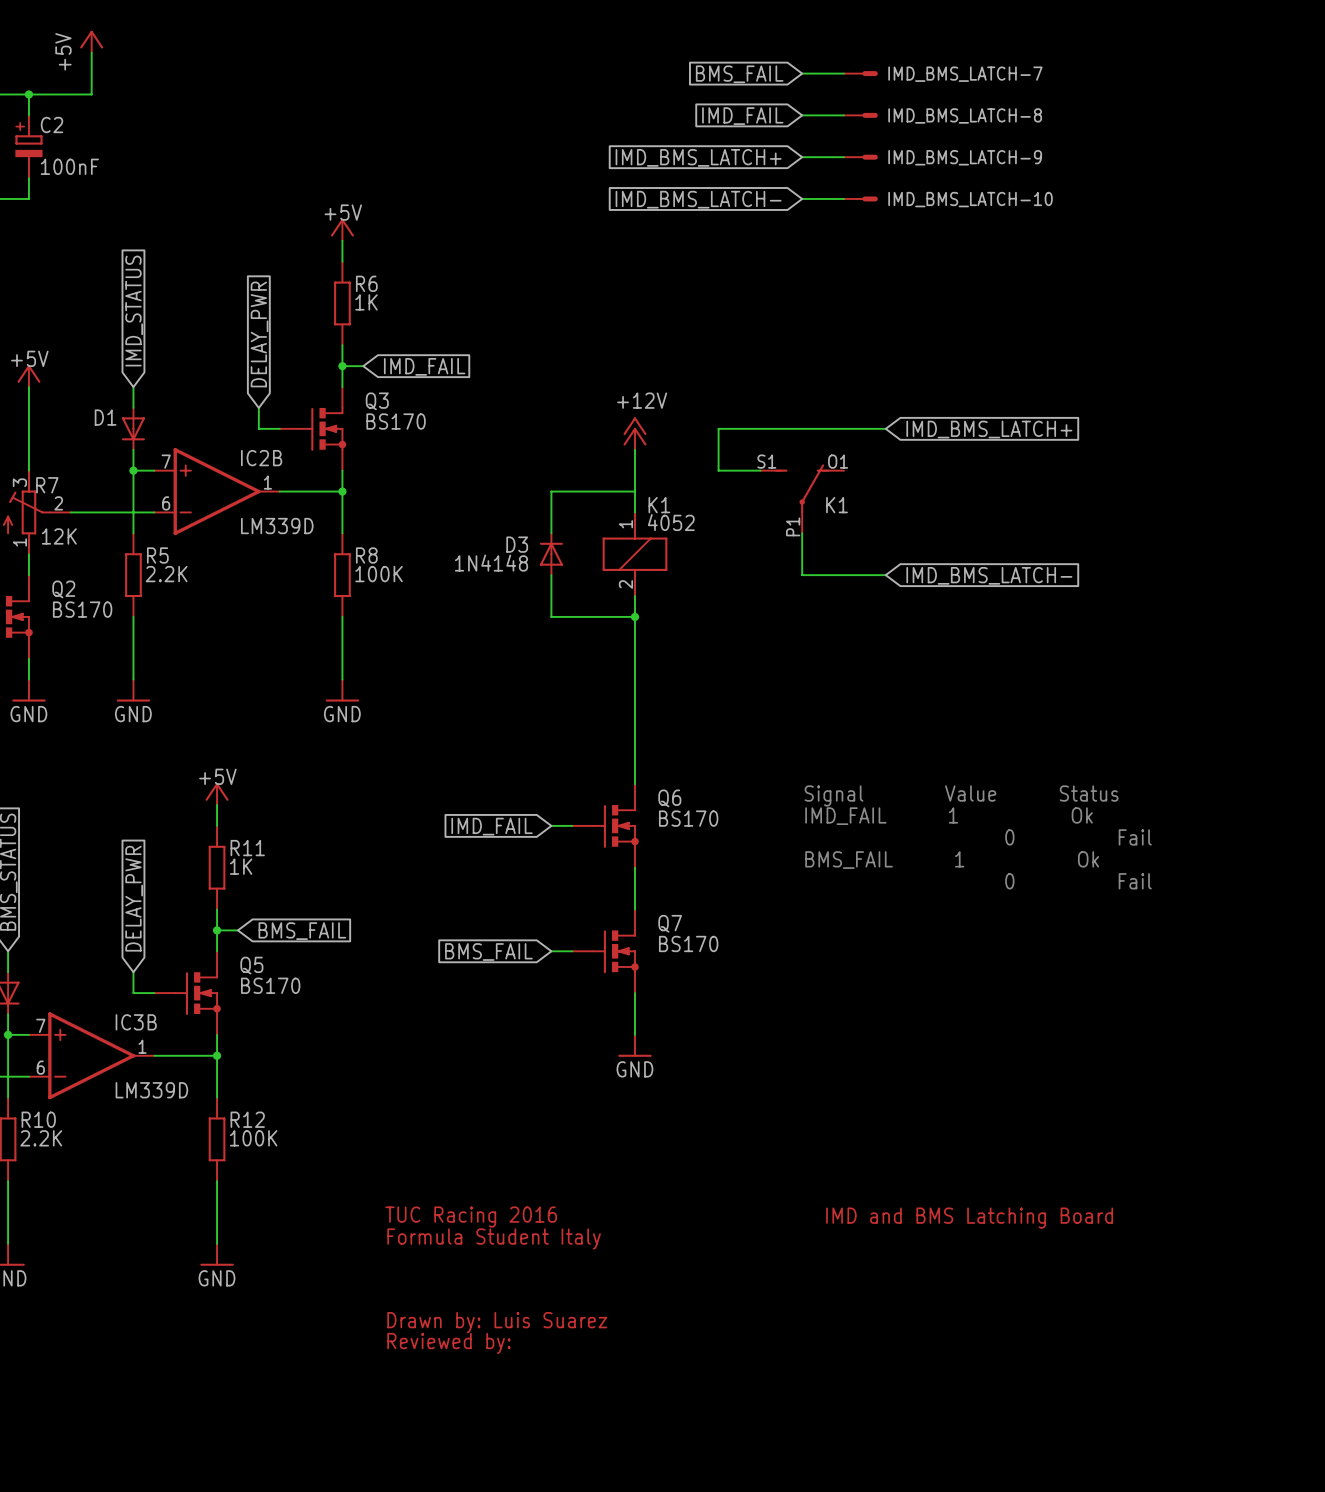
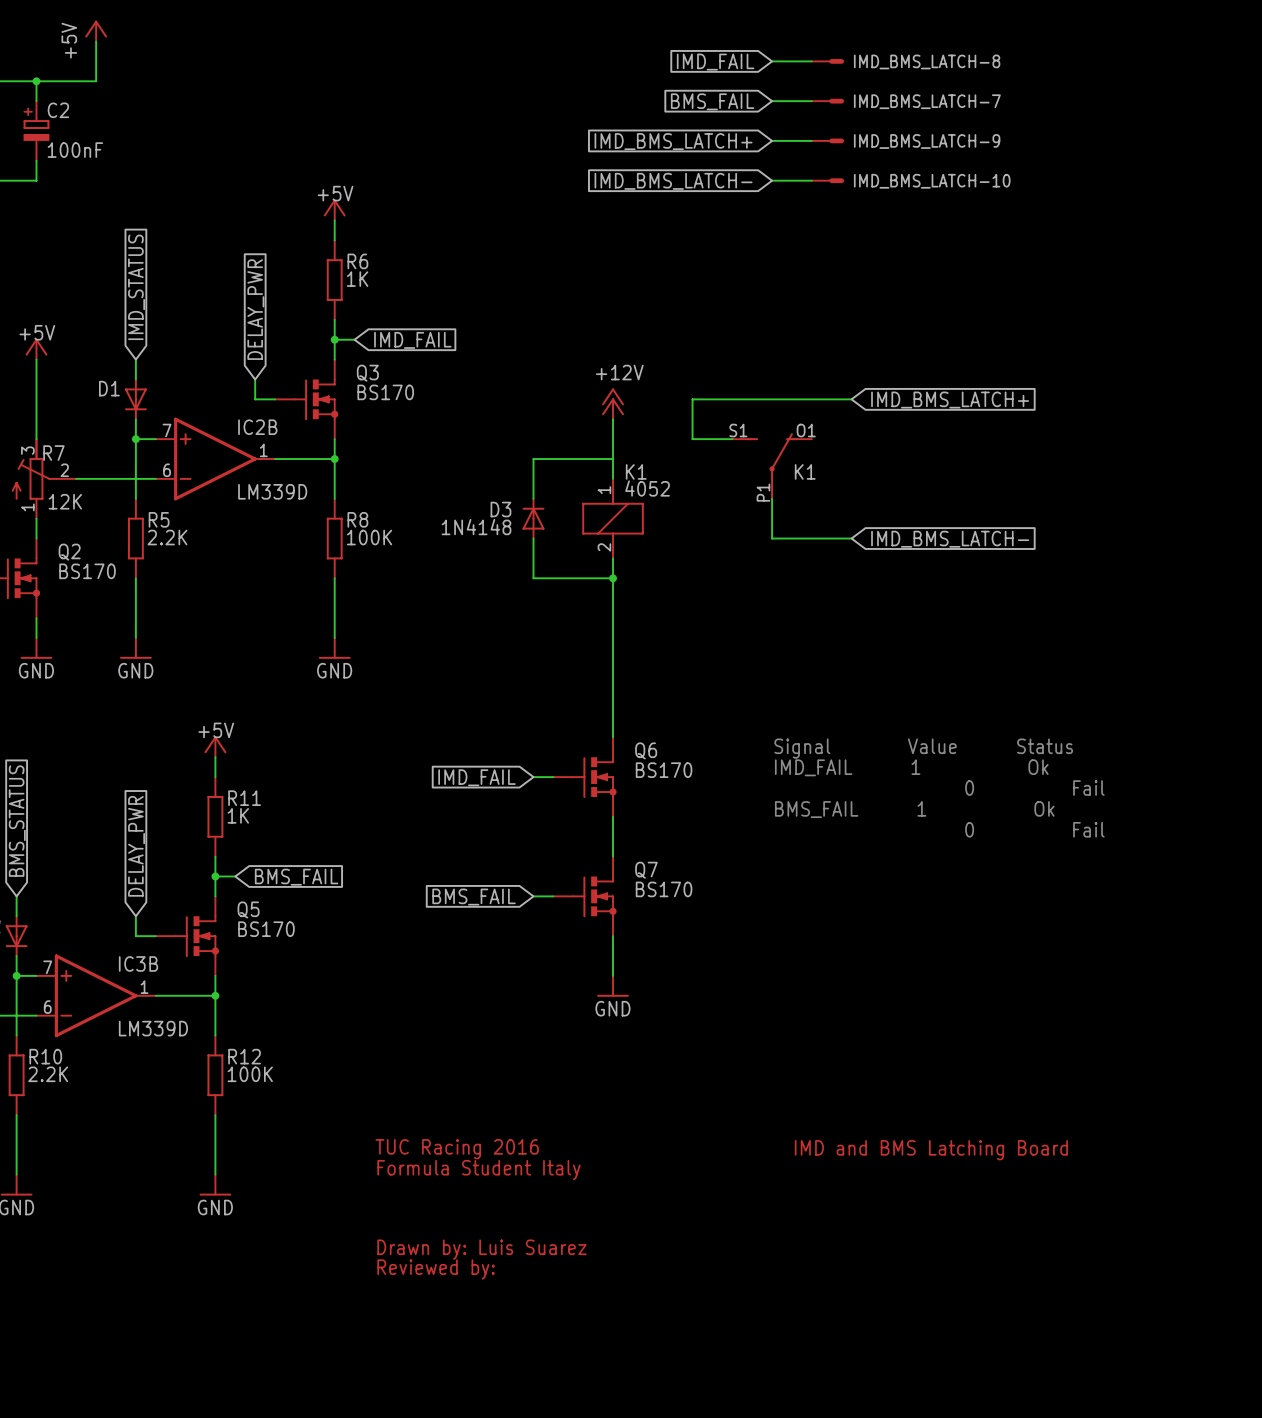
global label: BMS_FAIL (739, 74) -> IMD_FAIL (715, 62)
IMD_BMS_LATCH-7 name: IMD_BMS_LATCH-7 (965, 74) -> IMD_BMS_LATCH-8 (927, 61)
IMD_BMS_LATCH-8 name: IMD_BMS_LATCH-8 (965, 115) -> IMD_BMS_LATCH-7 (927, 101)
global label: IMD_FAIL (742, 116) -> BMS_FAIL (712, 101)

